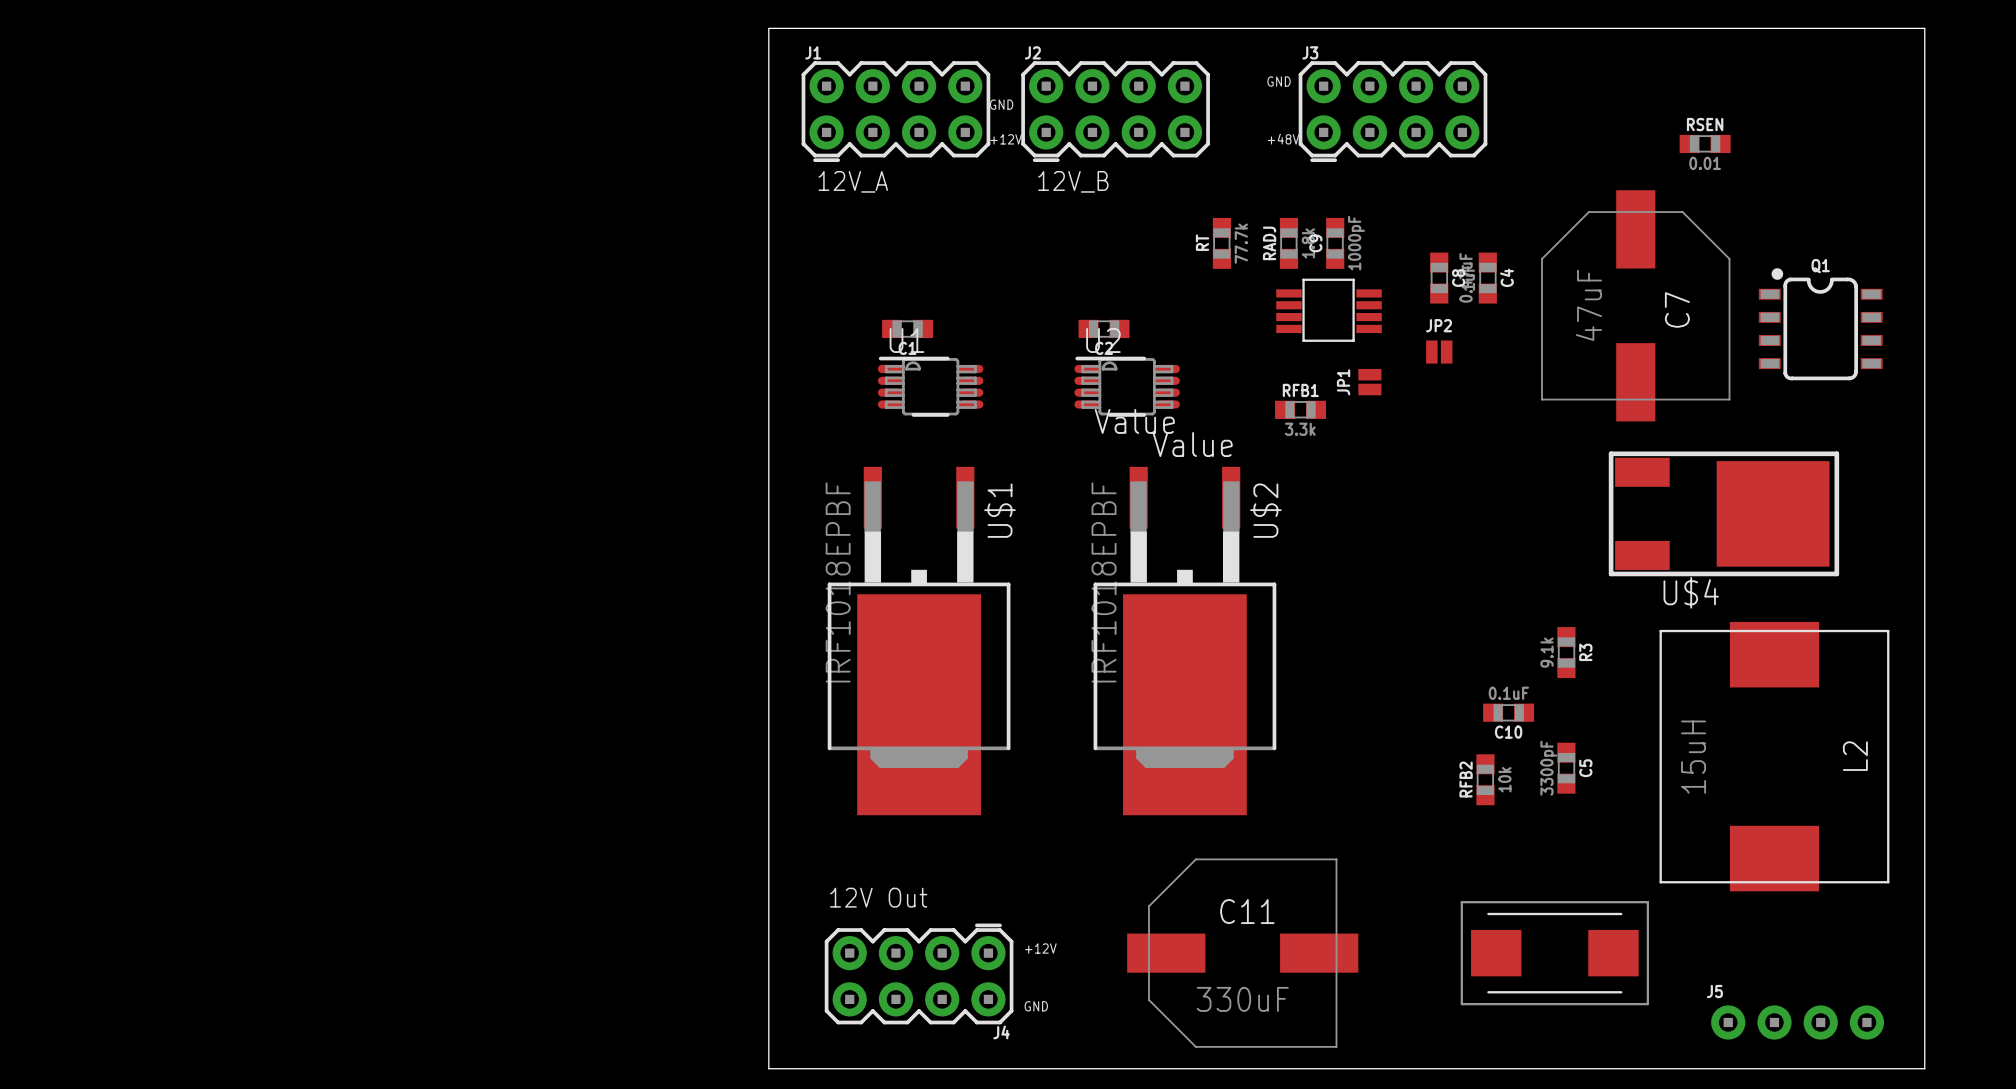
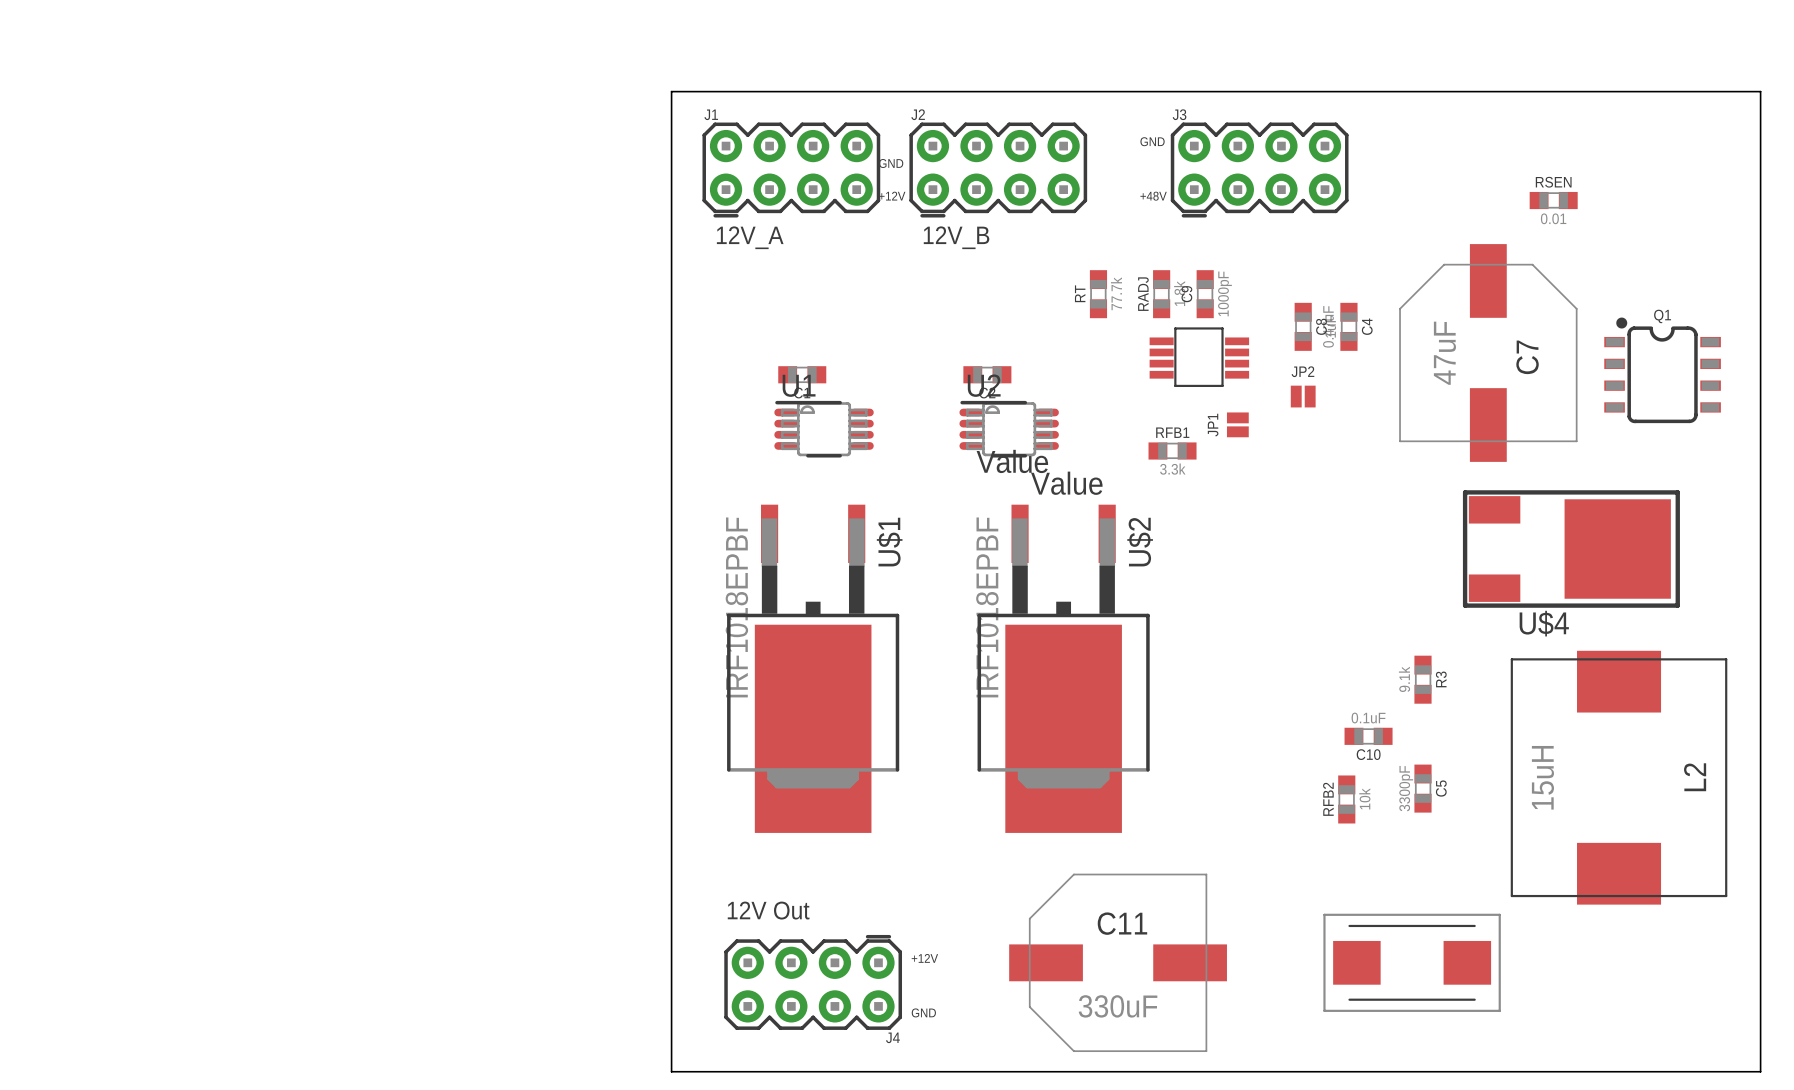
J5: (1797, 1022) -> none

